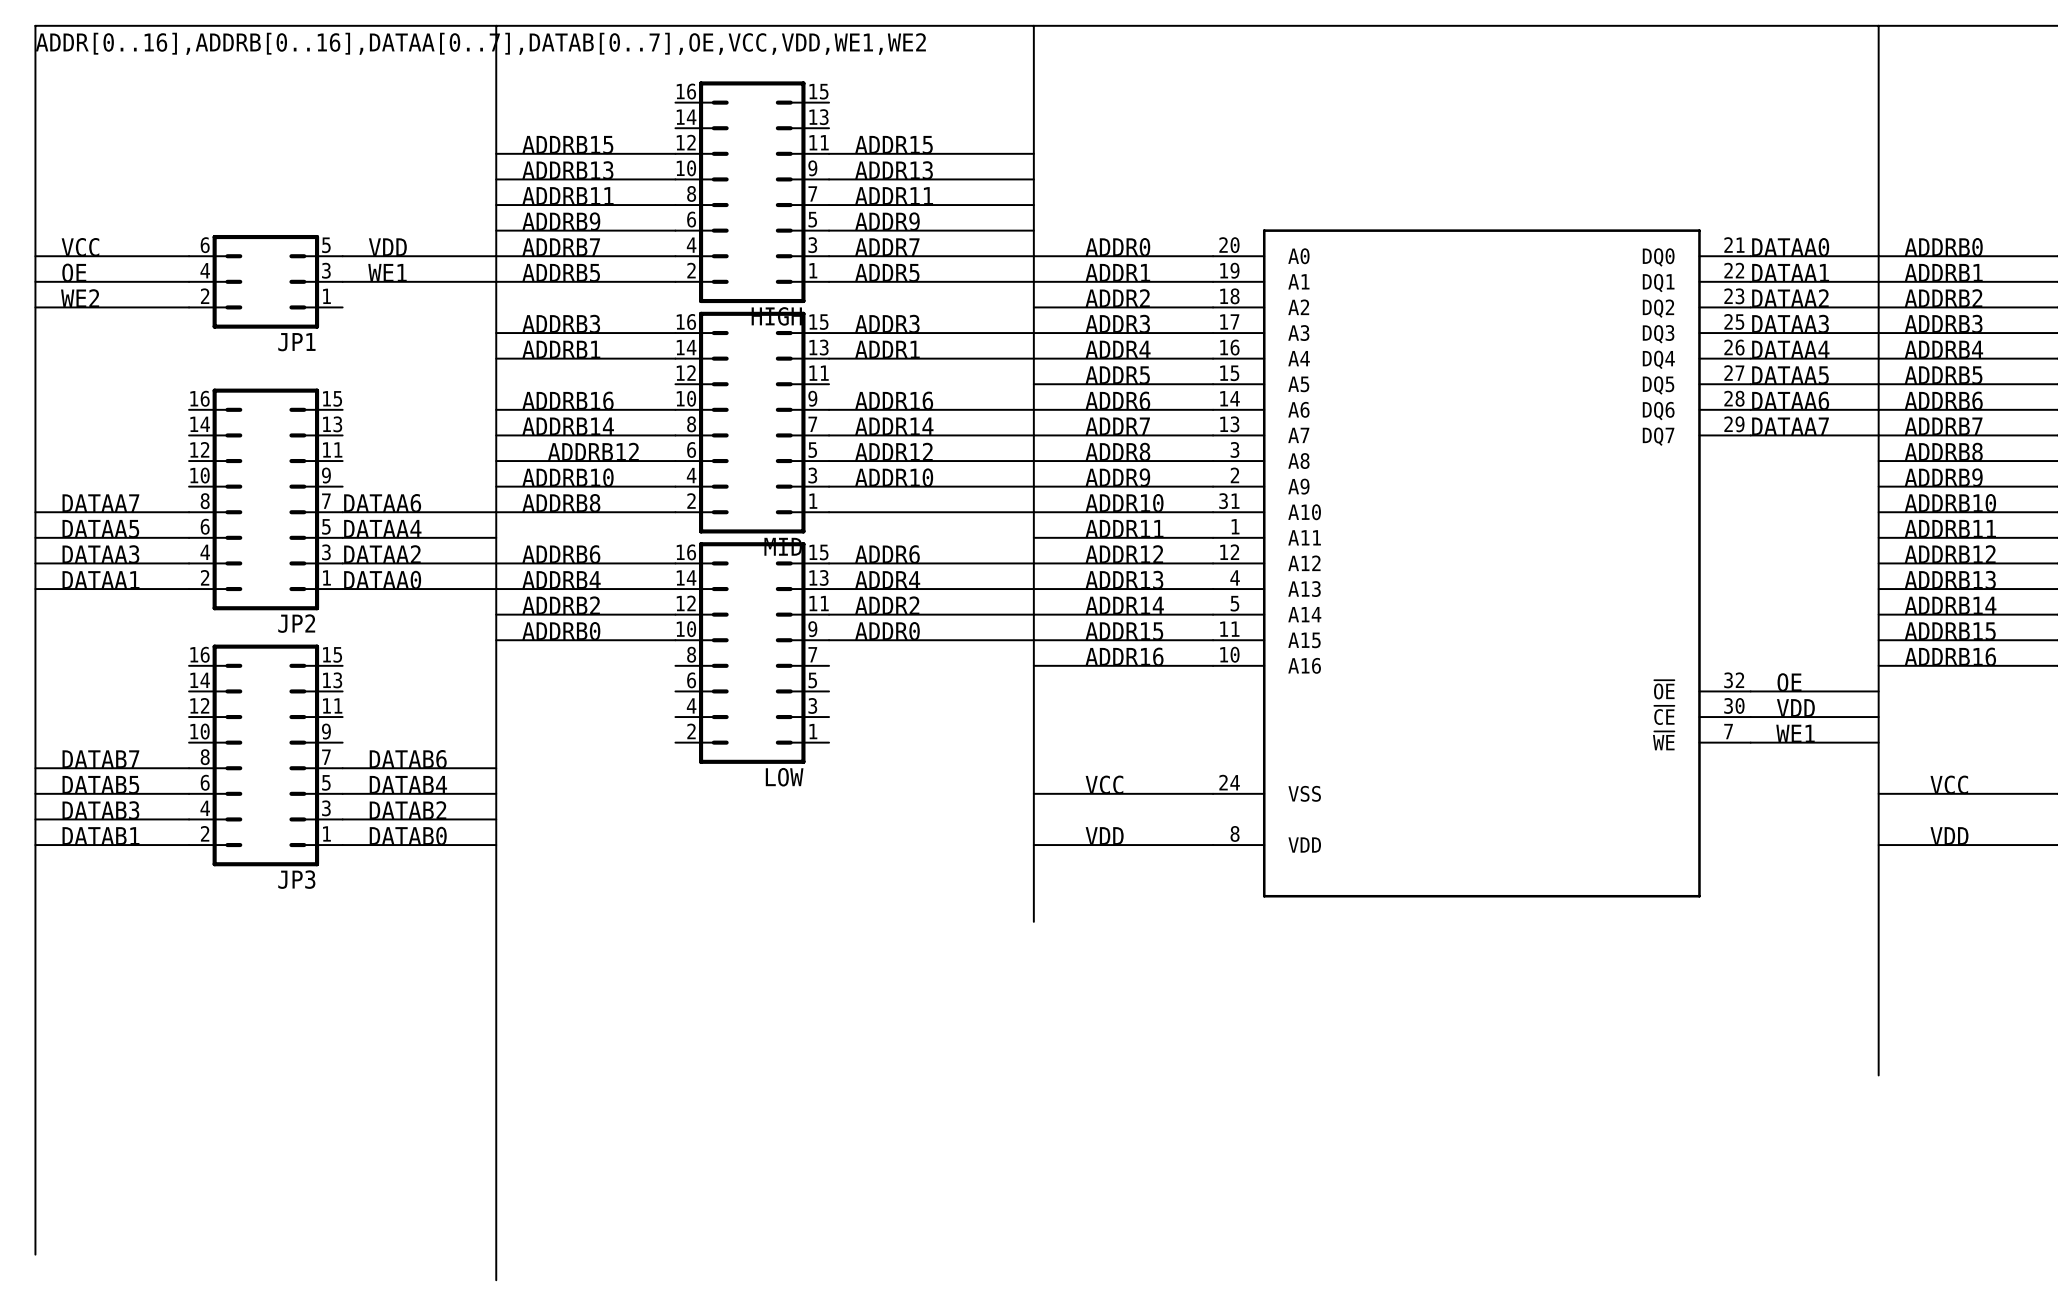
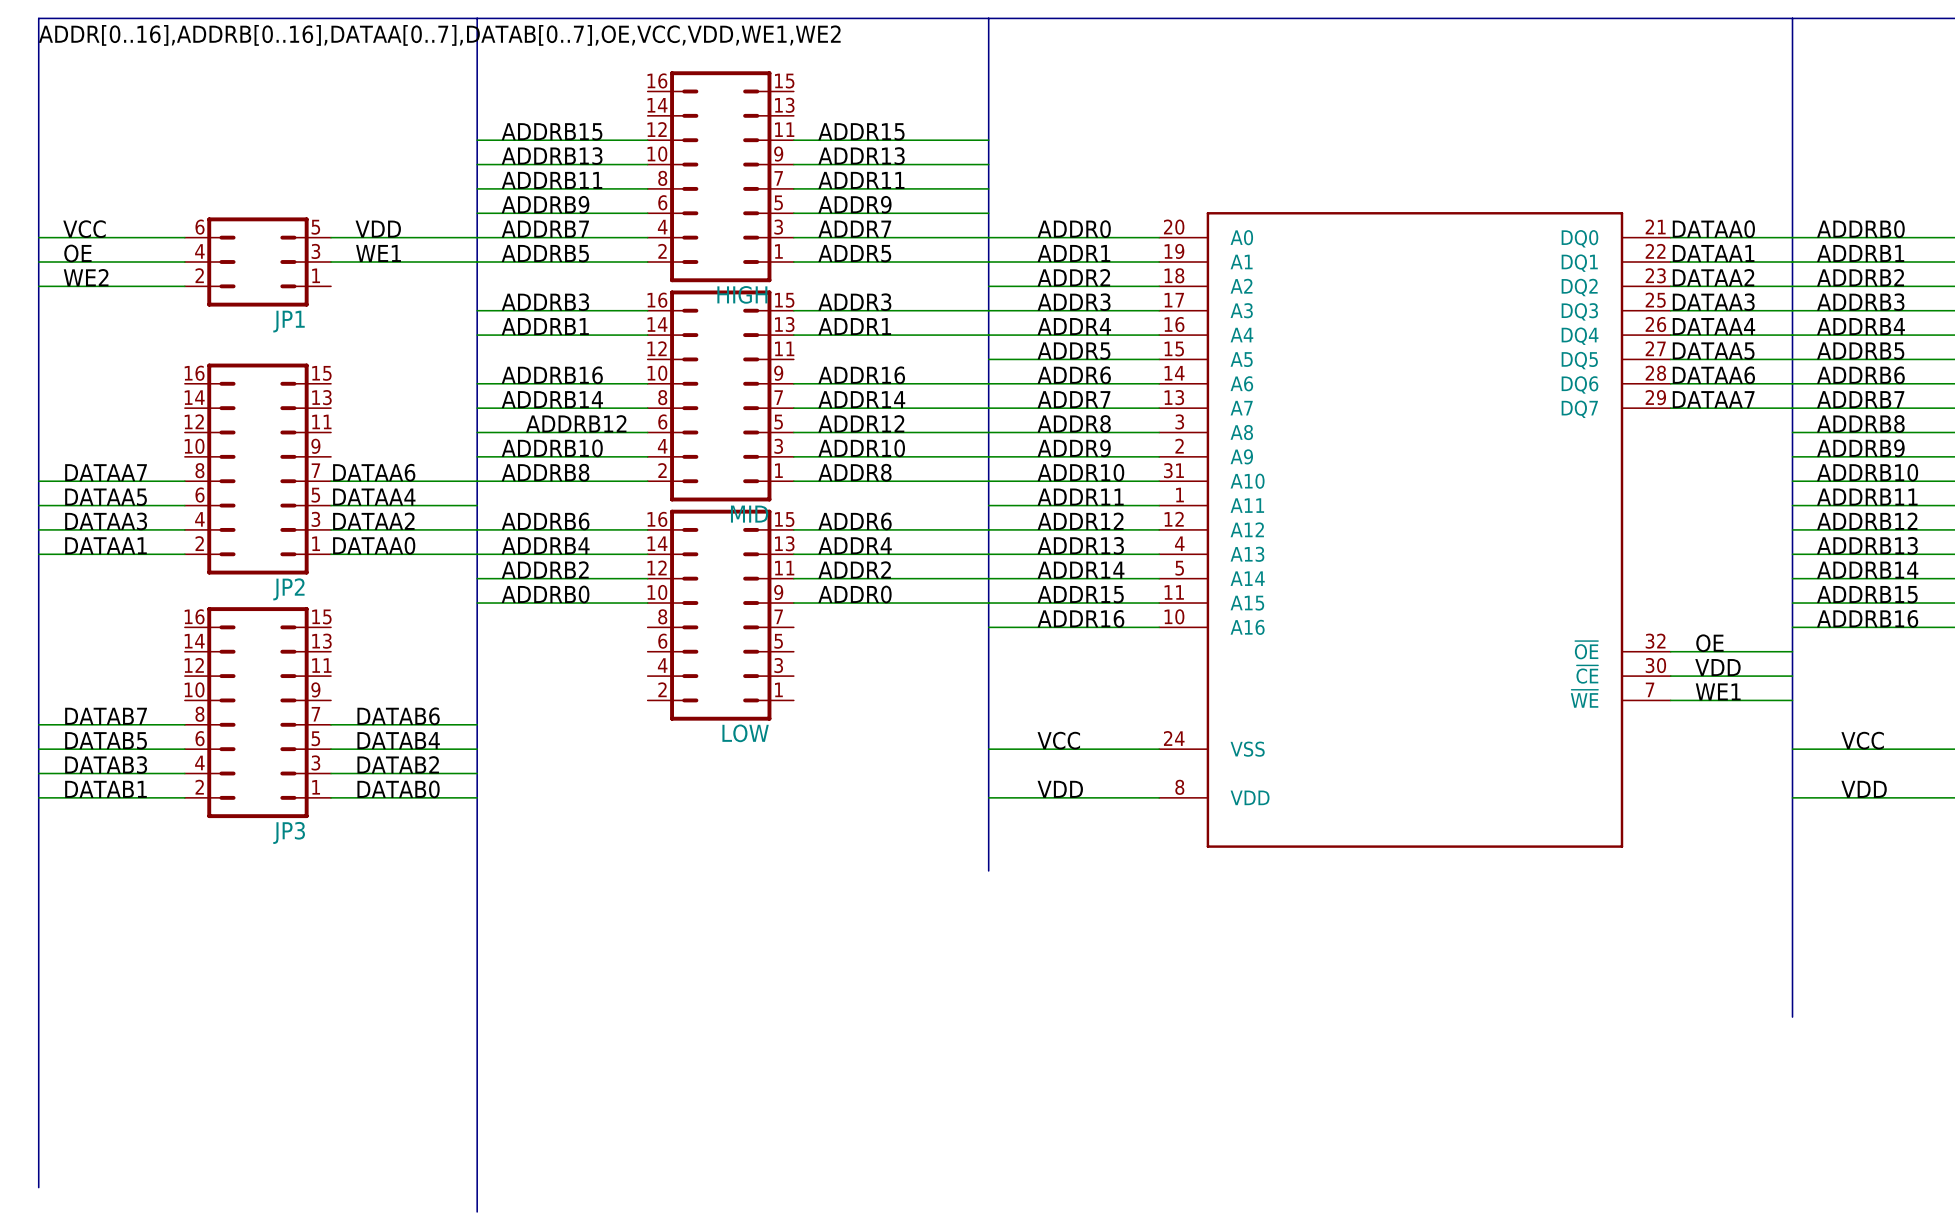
label: none -> ADDR8 (854, 472)

